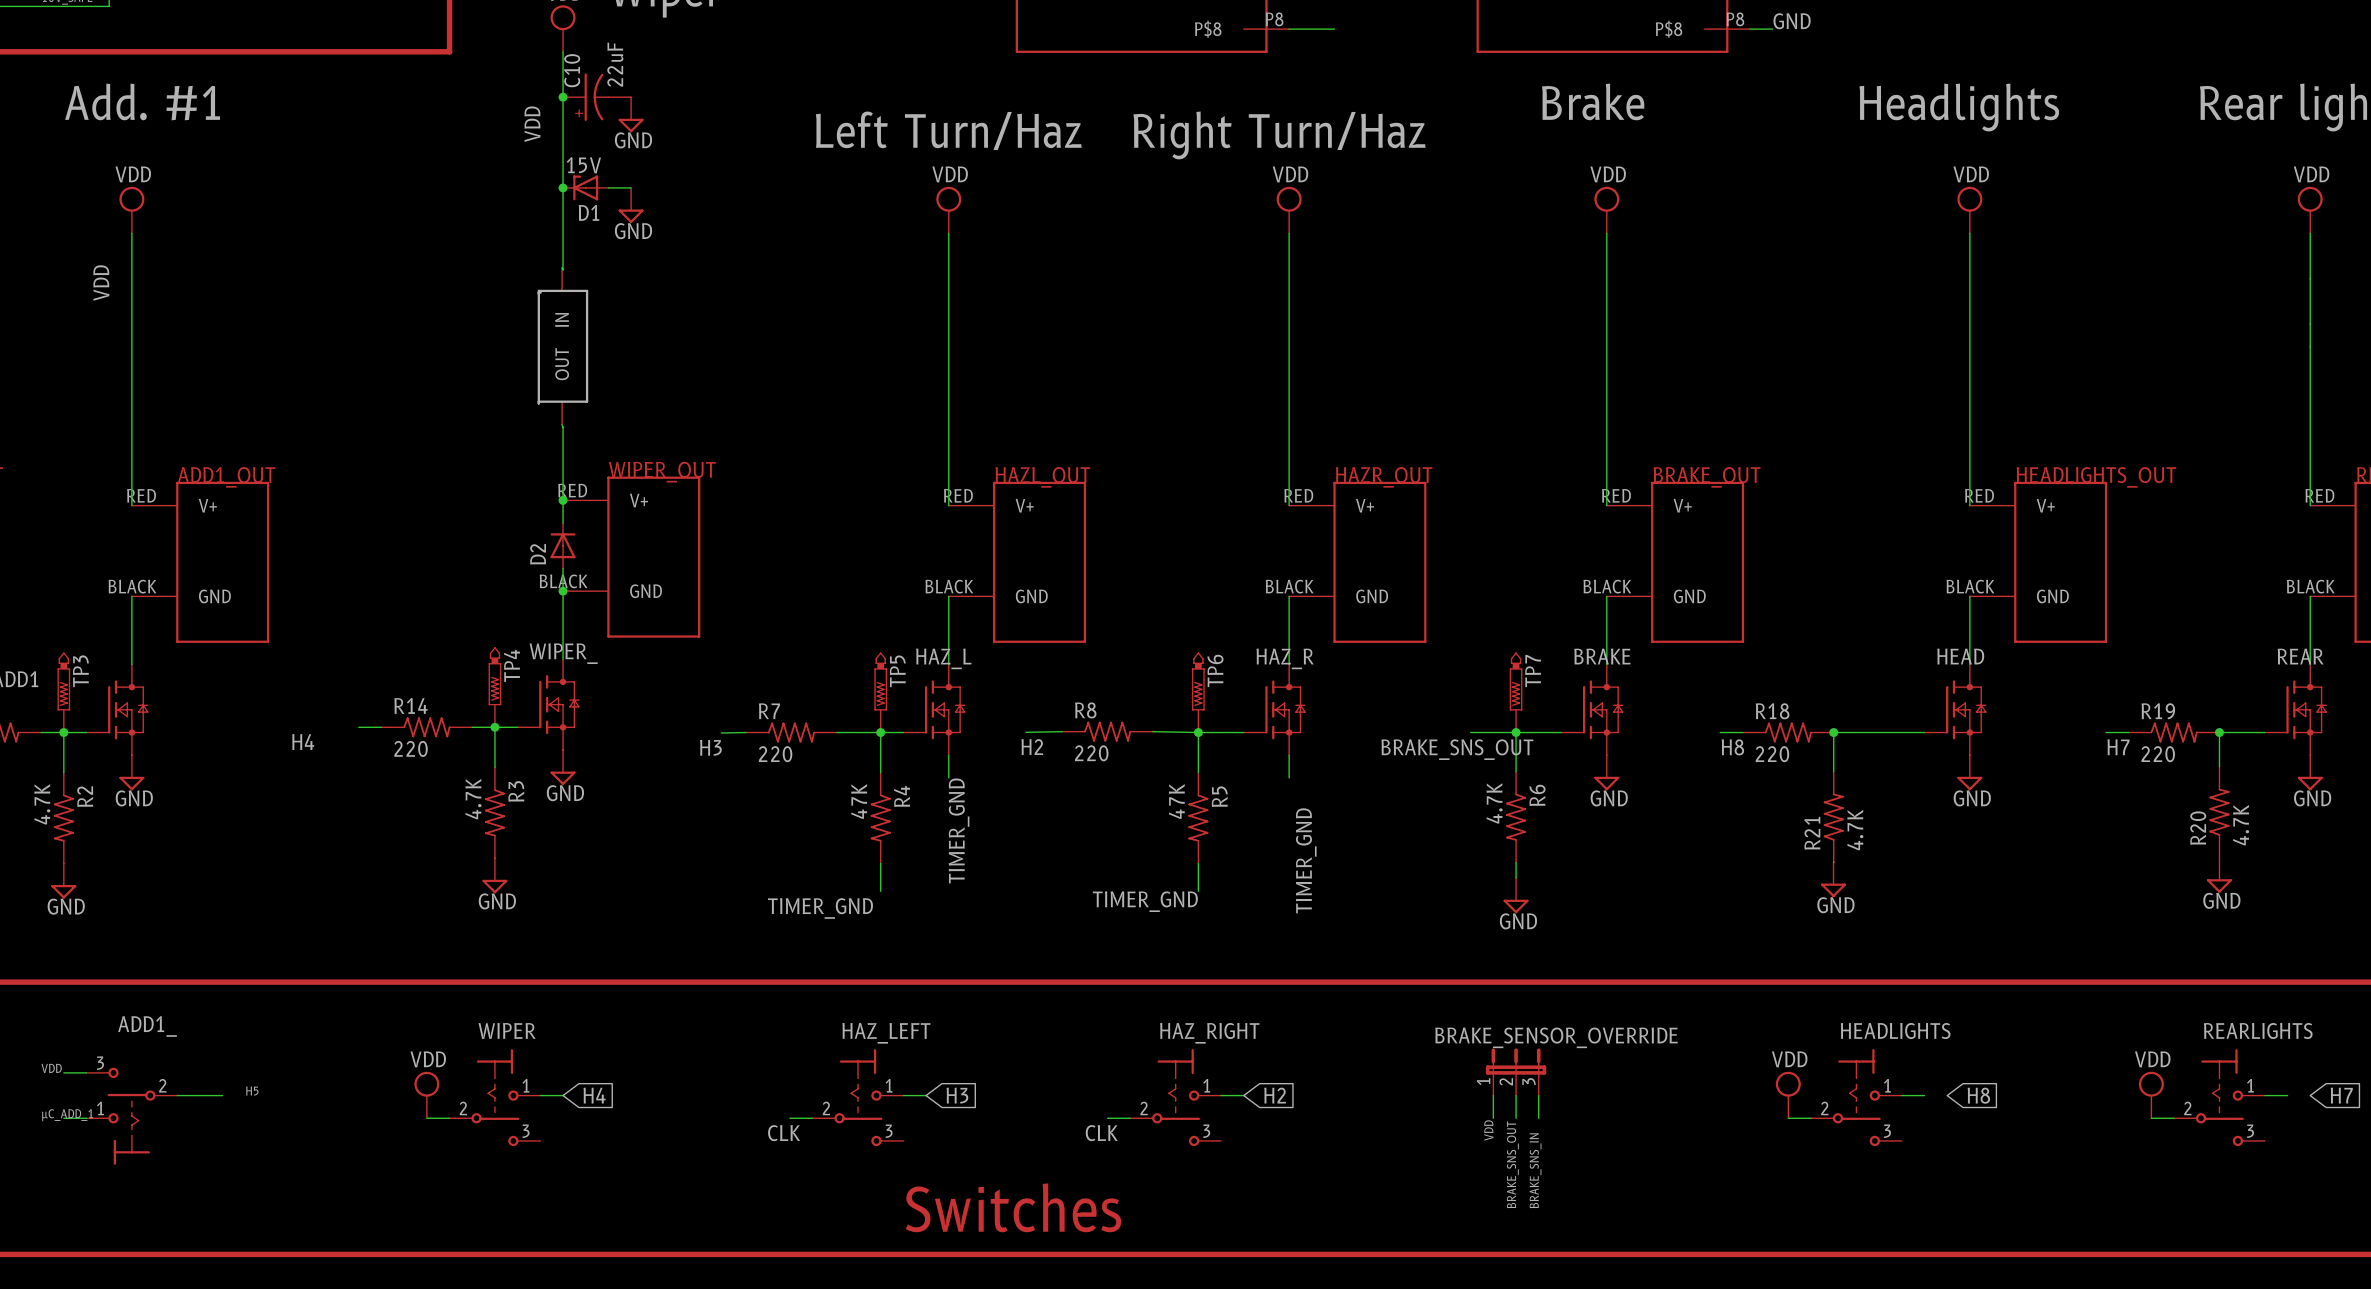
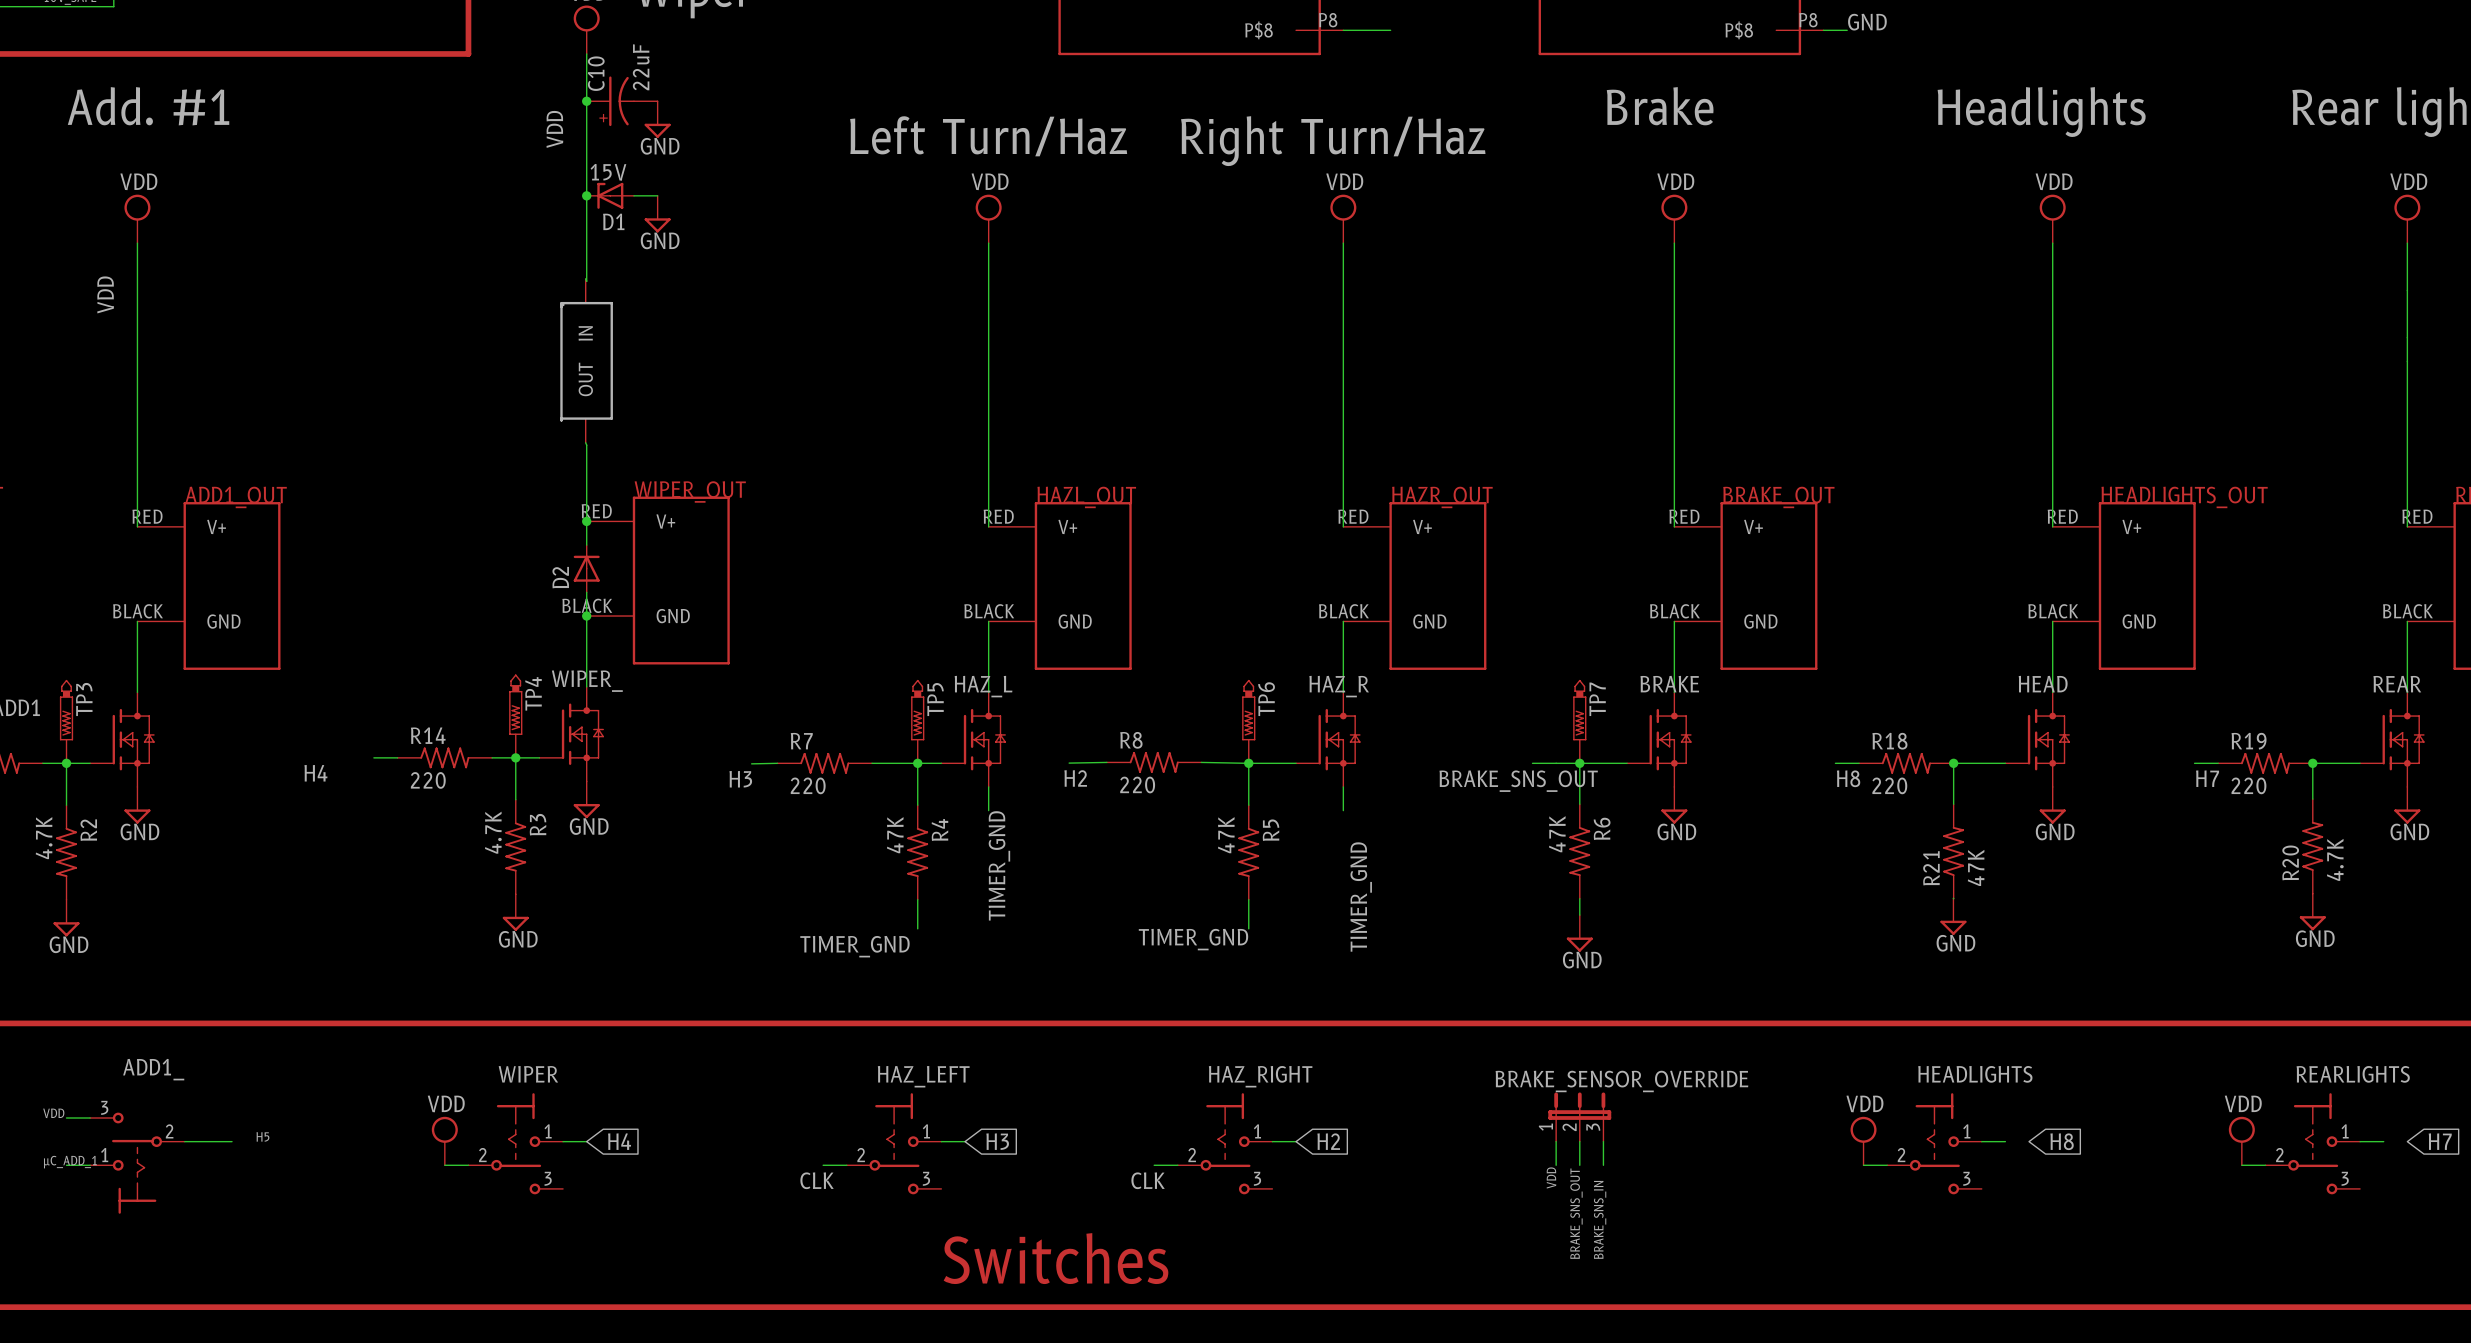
wire: (1720, 732) (1742, 732) -> (1835, 763) (1859, 763)
R18 position: (1788, 732) -> (1906, 763)
junction position: (1833, 732) -> (1953, 763)
wire: (1874, 732) (1833, 732) (1833, 771) -> (1953, 763) (1953, 804)
label position: H8 (1732, 747) -> H8 (1848, 778)
R6 value: 4.7K (1494, 803) -> 47K (1557, 834)
R21 position: (1833, 817) -> (1953, 851)
R21 value: 4.7K (1855, 830) -> 47K (1976, 867)
wire: (1833, 862) (1833, 862) -> (1953, 898) (1953, 898)
power symbol position: GND (1833, 879) -> GND (1953, 916)

